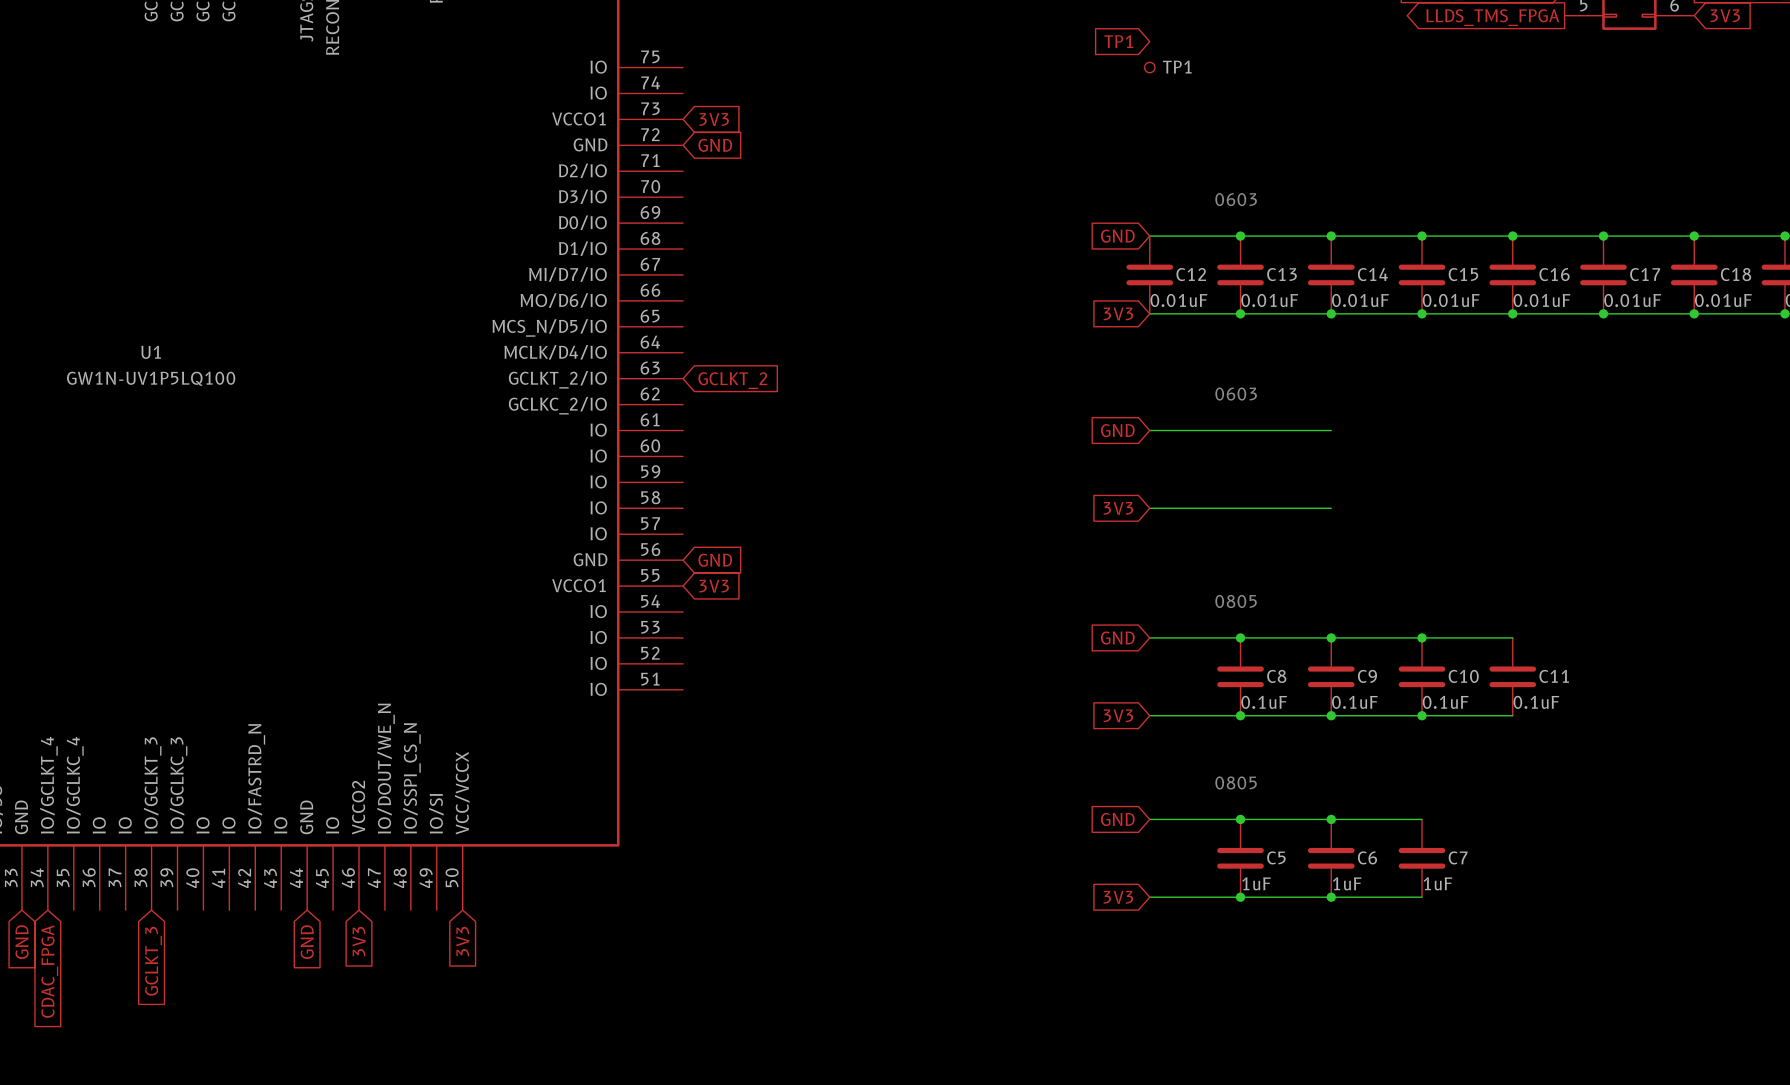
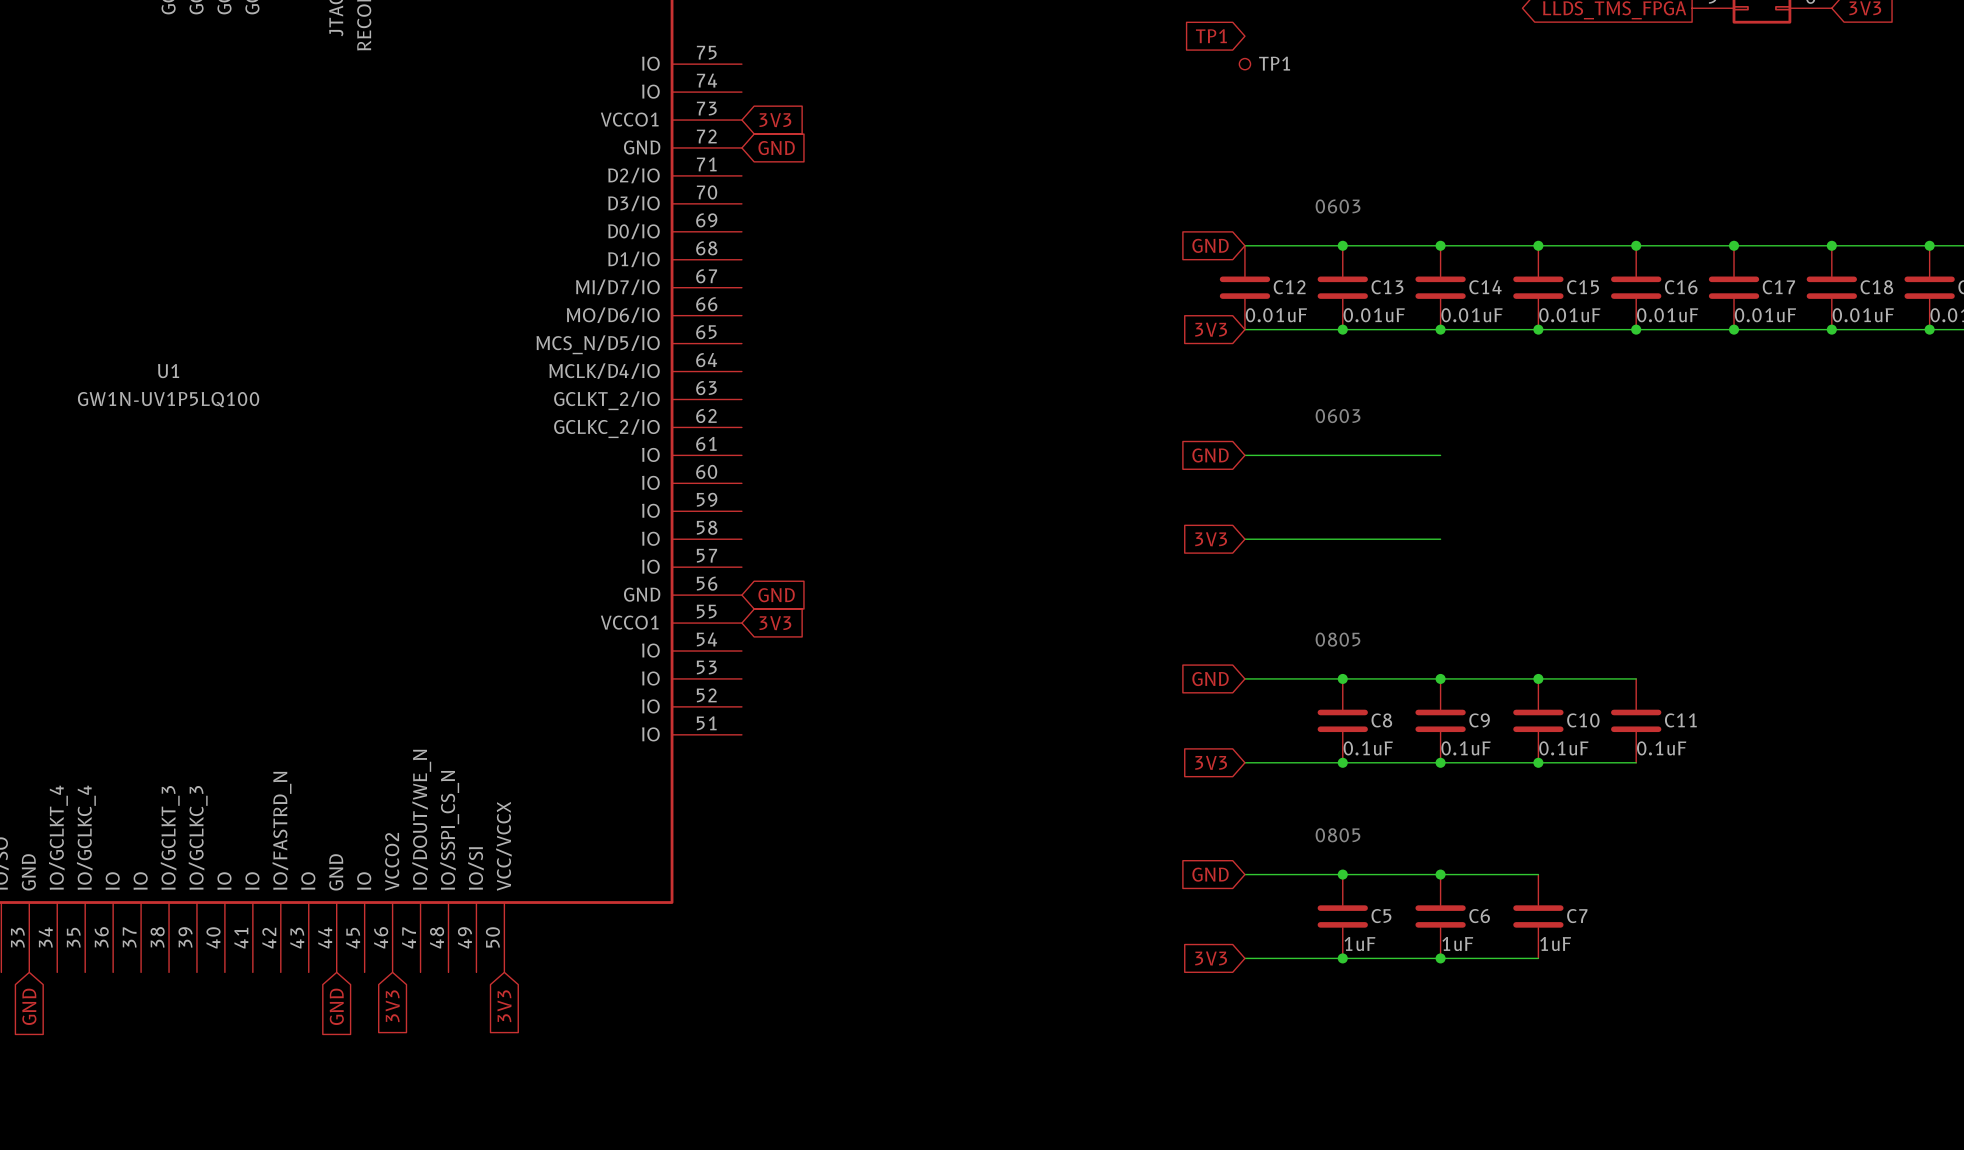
global label: GCLKT_2 (732, 380) -> none
global label: GCLKT_3 (153, 961) -> none
global label: CDAC_FPGA (49, 971) -> none

